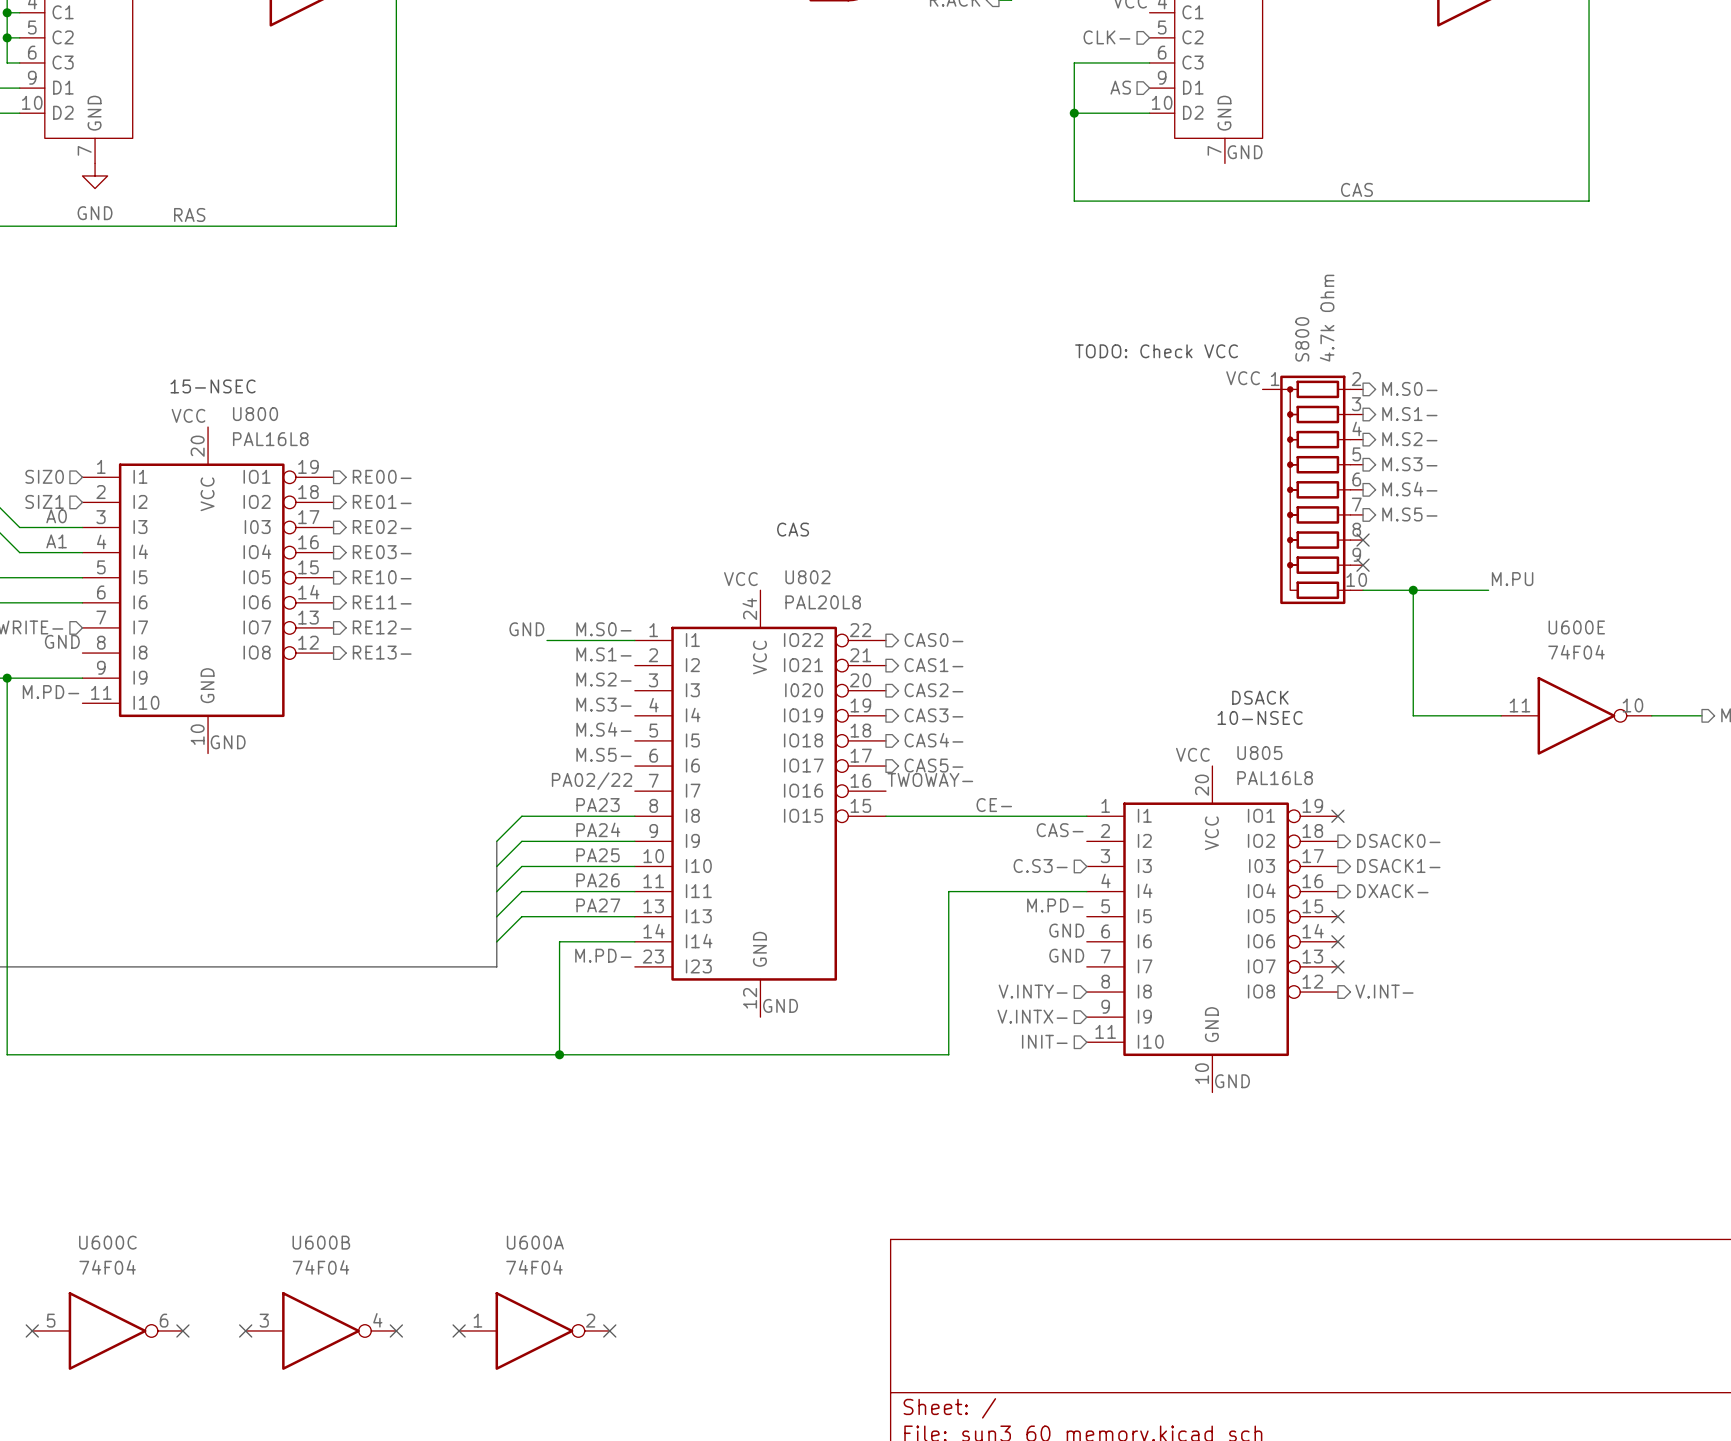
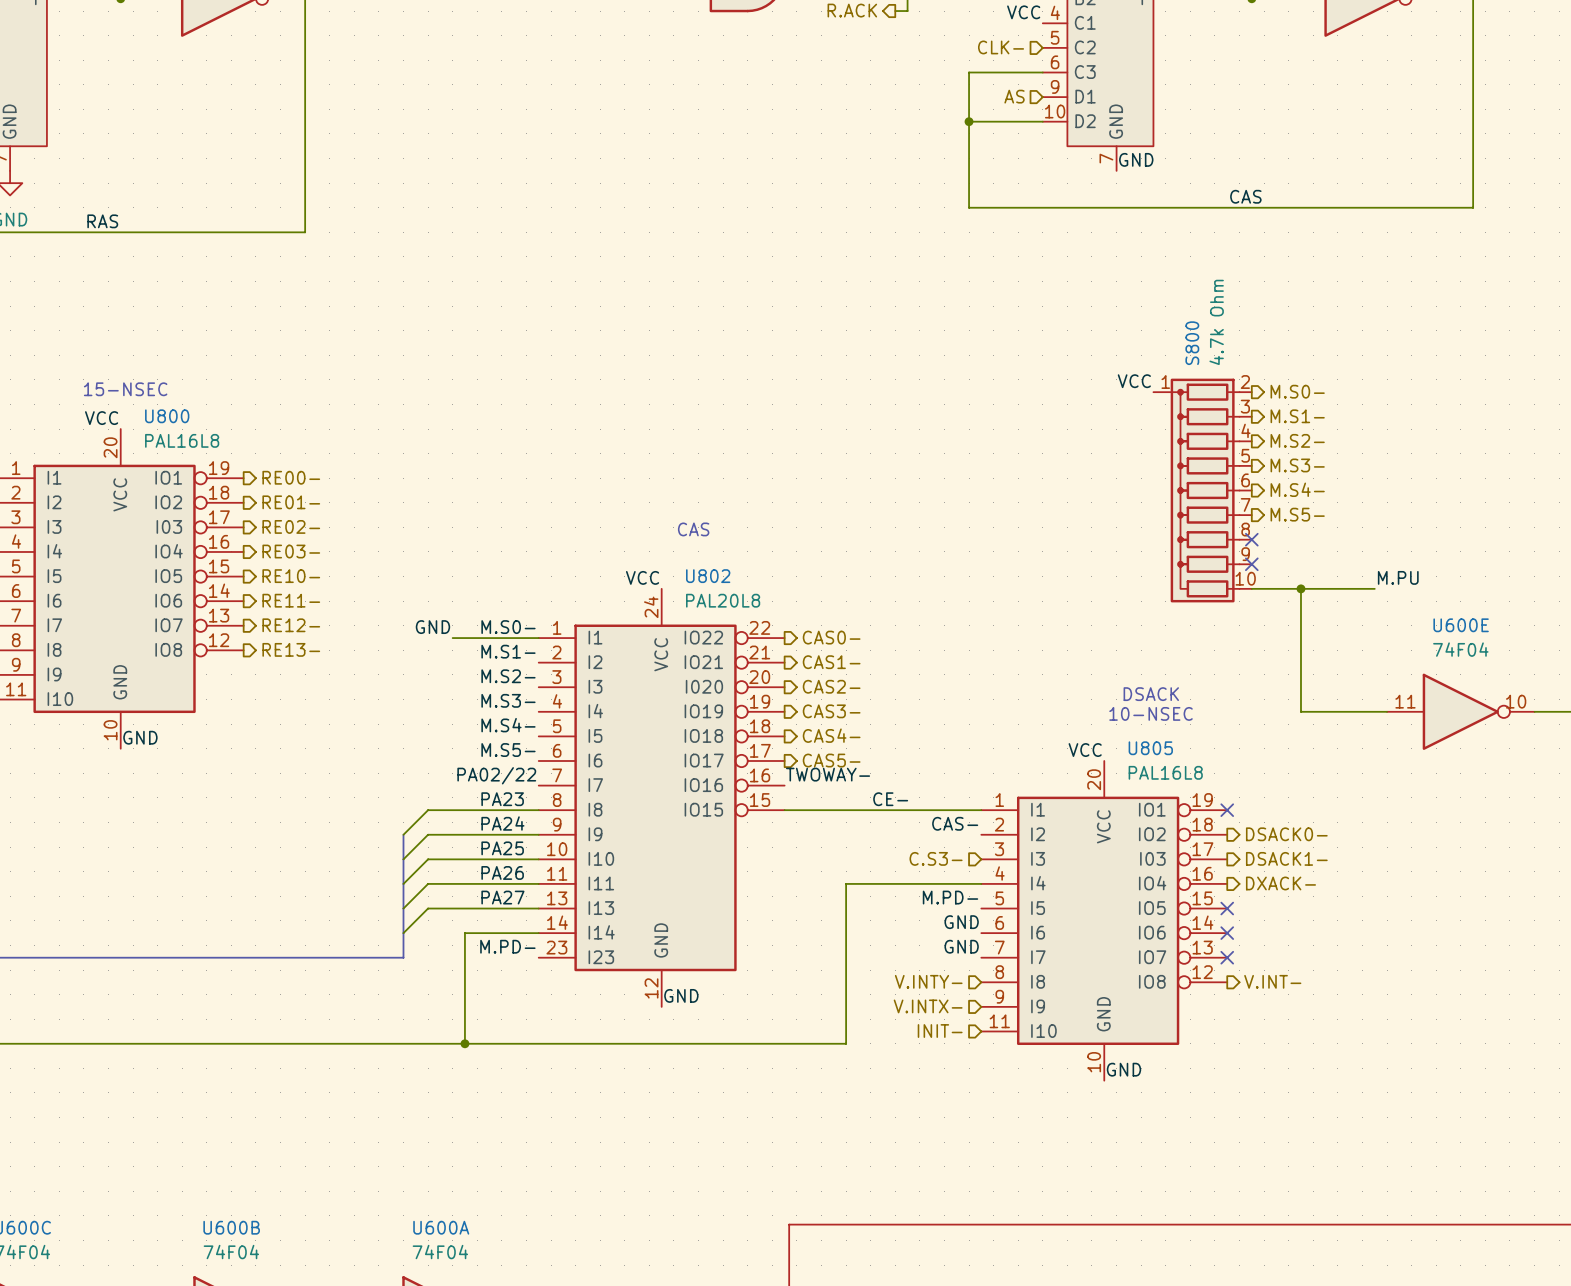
text: TODO: Check VCC (1156, 351) -> none

